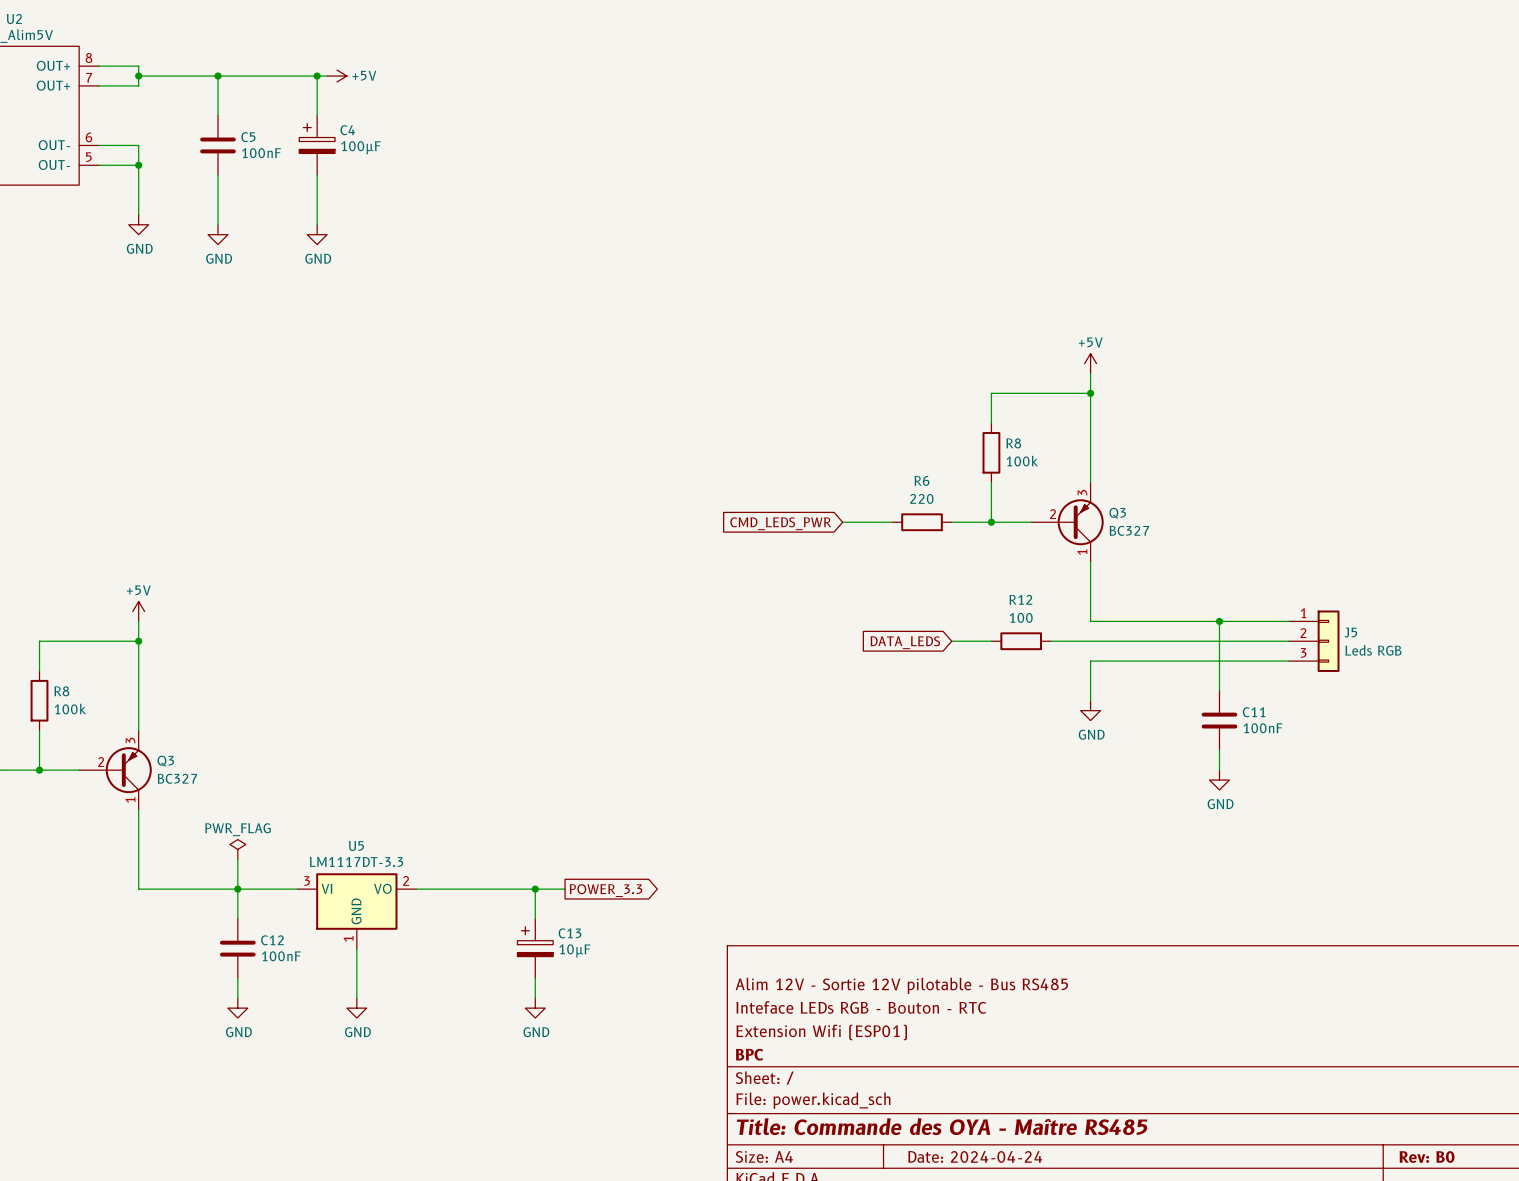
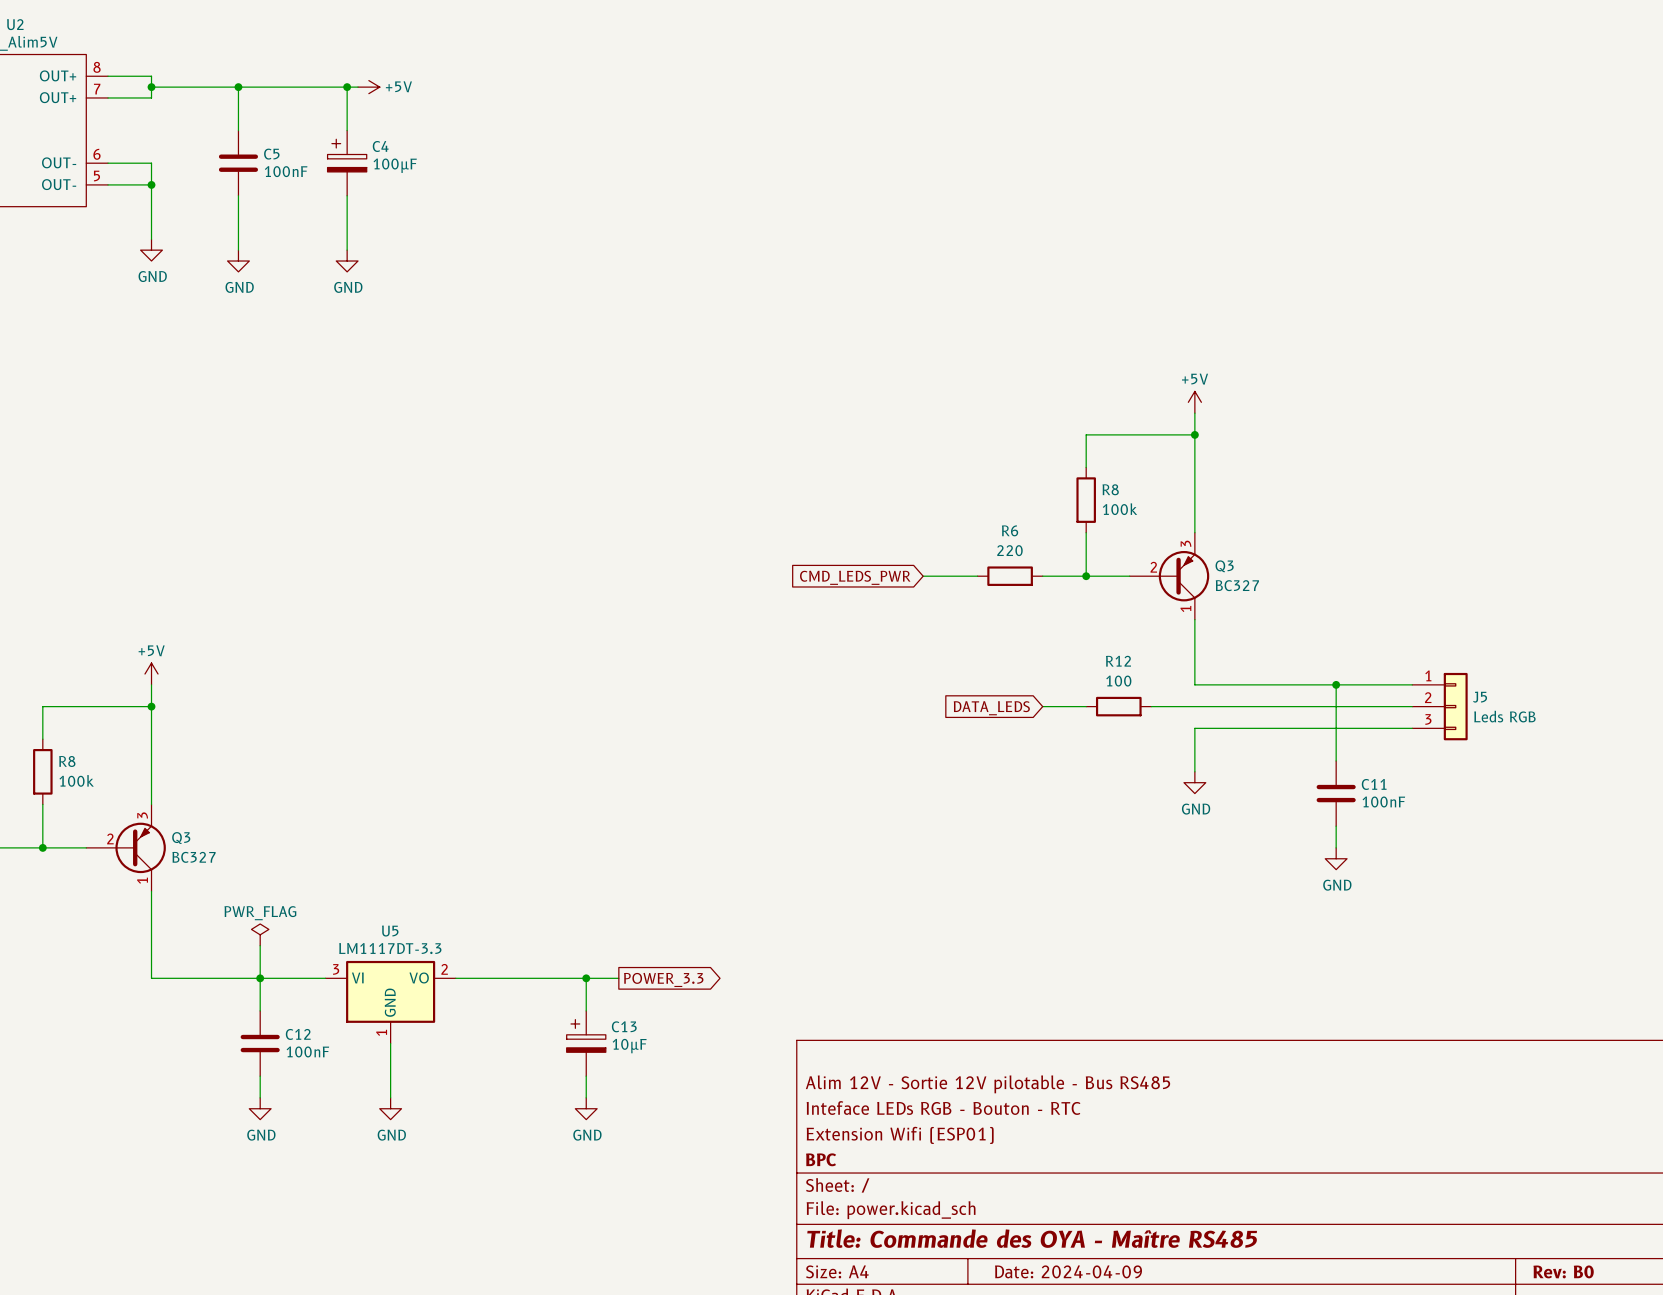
title block: Date: 2024-04-24 (975, 1156) -> Date: 2024-04-09 (1068, 1271)

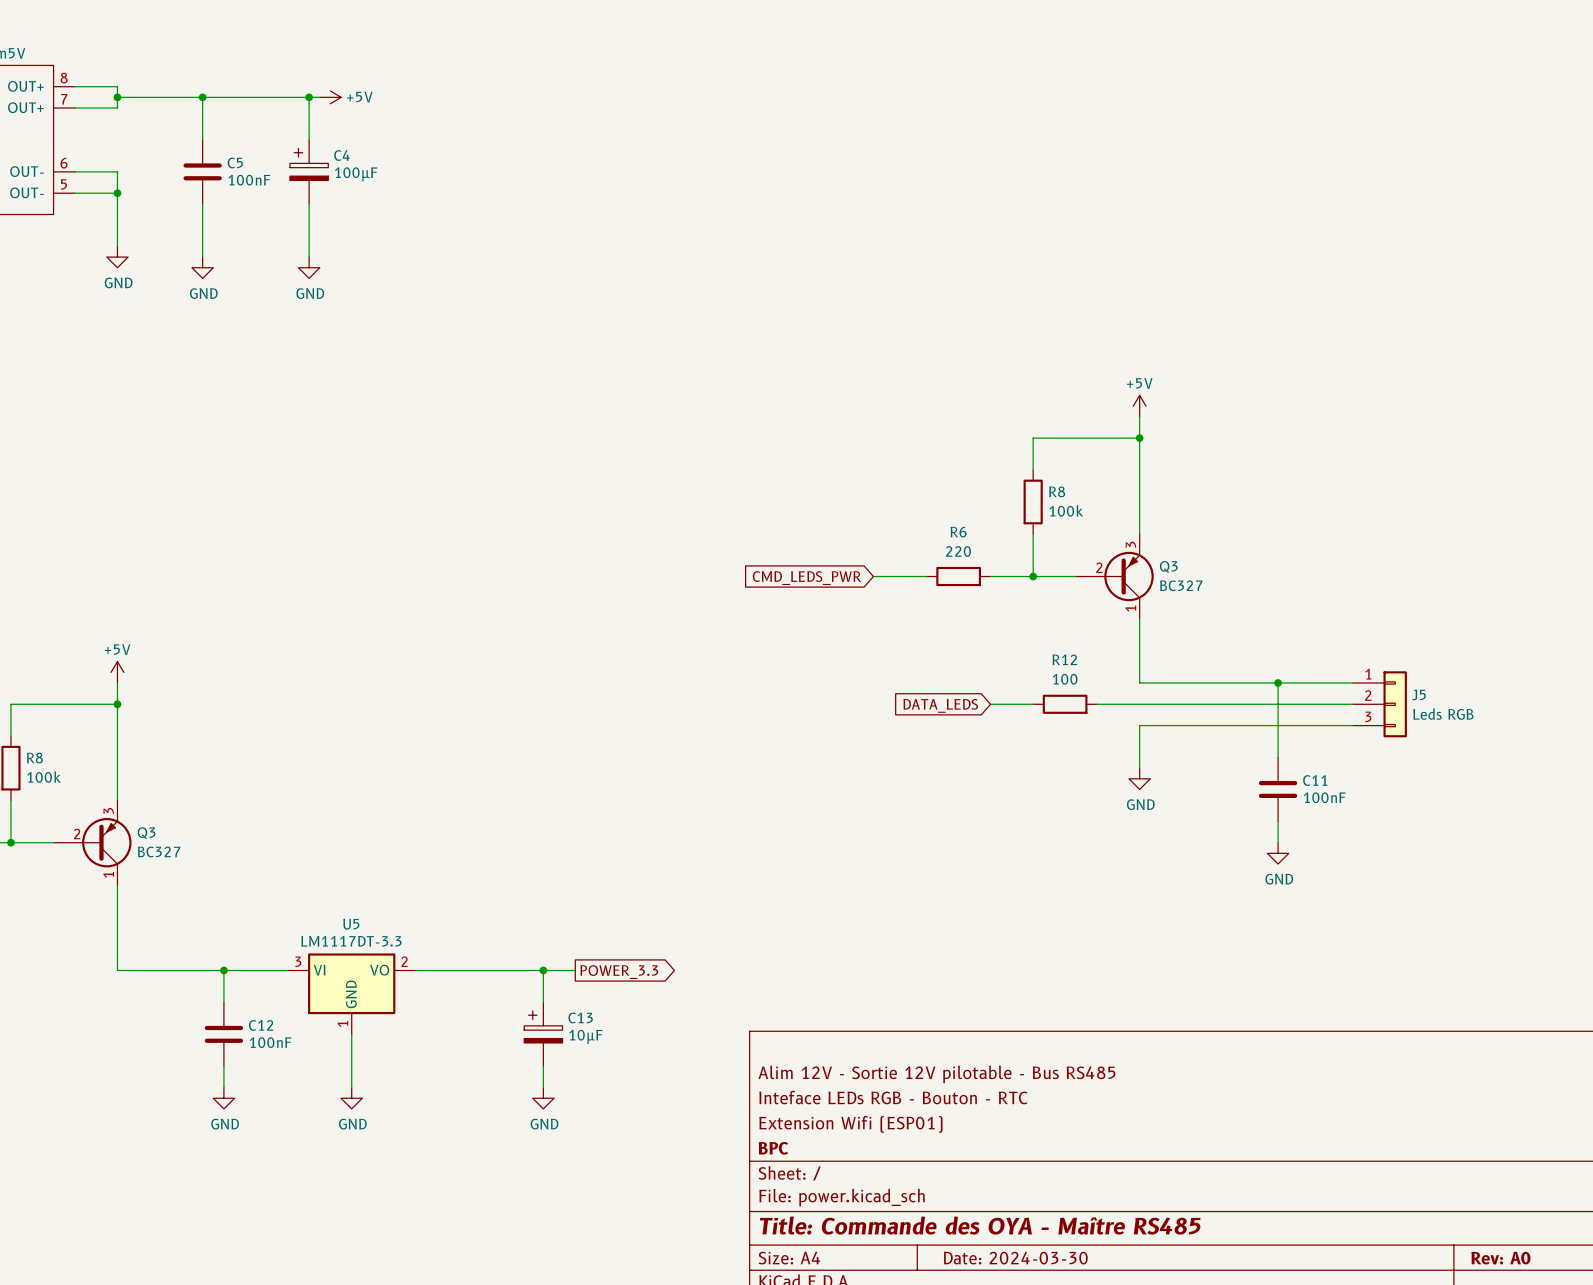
power symbol: PWR_FLAG (260, 934) -> none
wire: (260, 945) (260, 978) -> none
title block: Date: 2024-04-09 (1068, 1271) -> Date: 2024-03-30 (1015, 1258)
title block: Rev: B0 (1563, 1271) -> Rev: A0 (1500, 1258)

